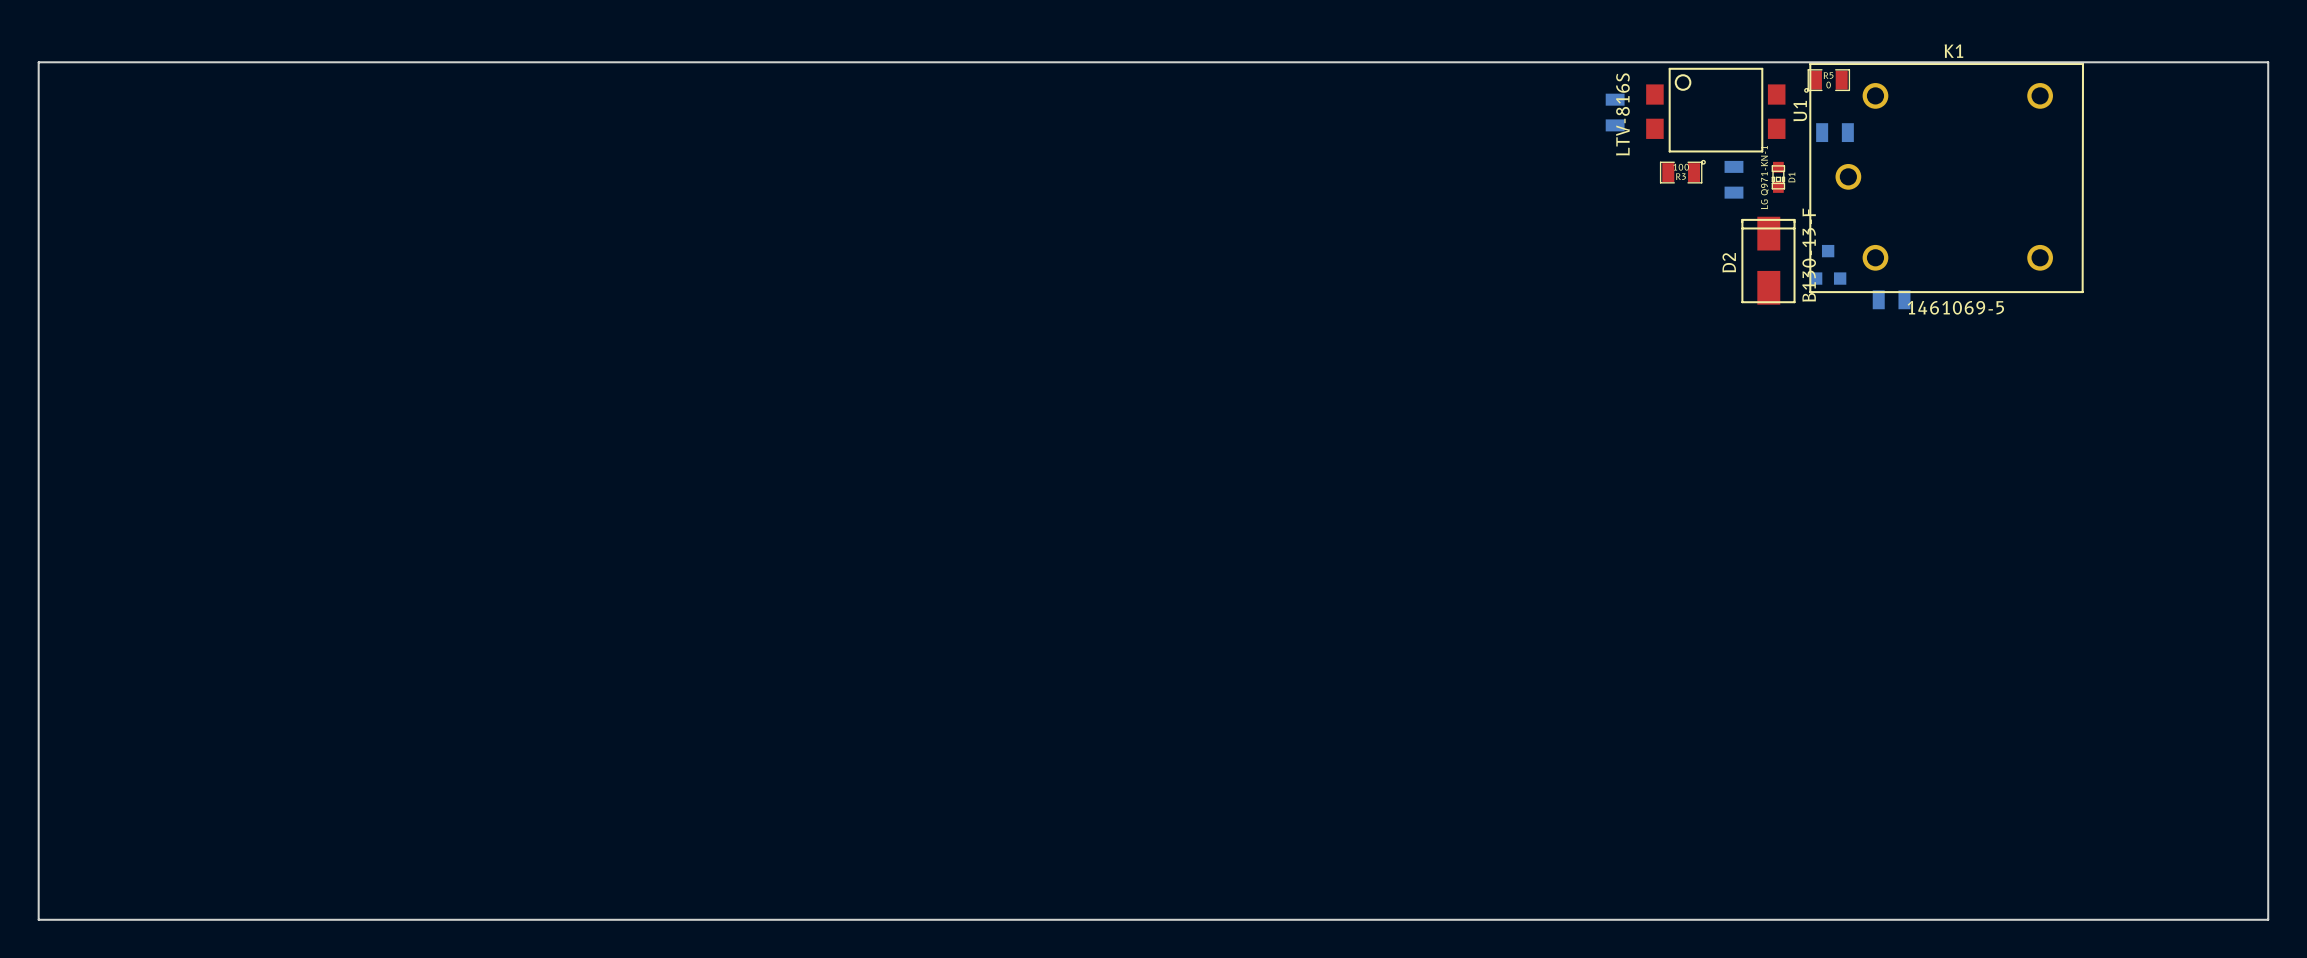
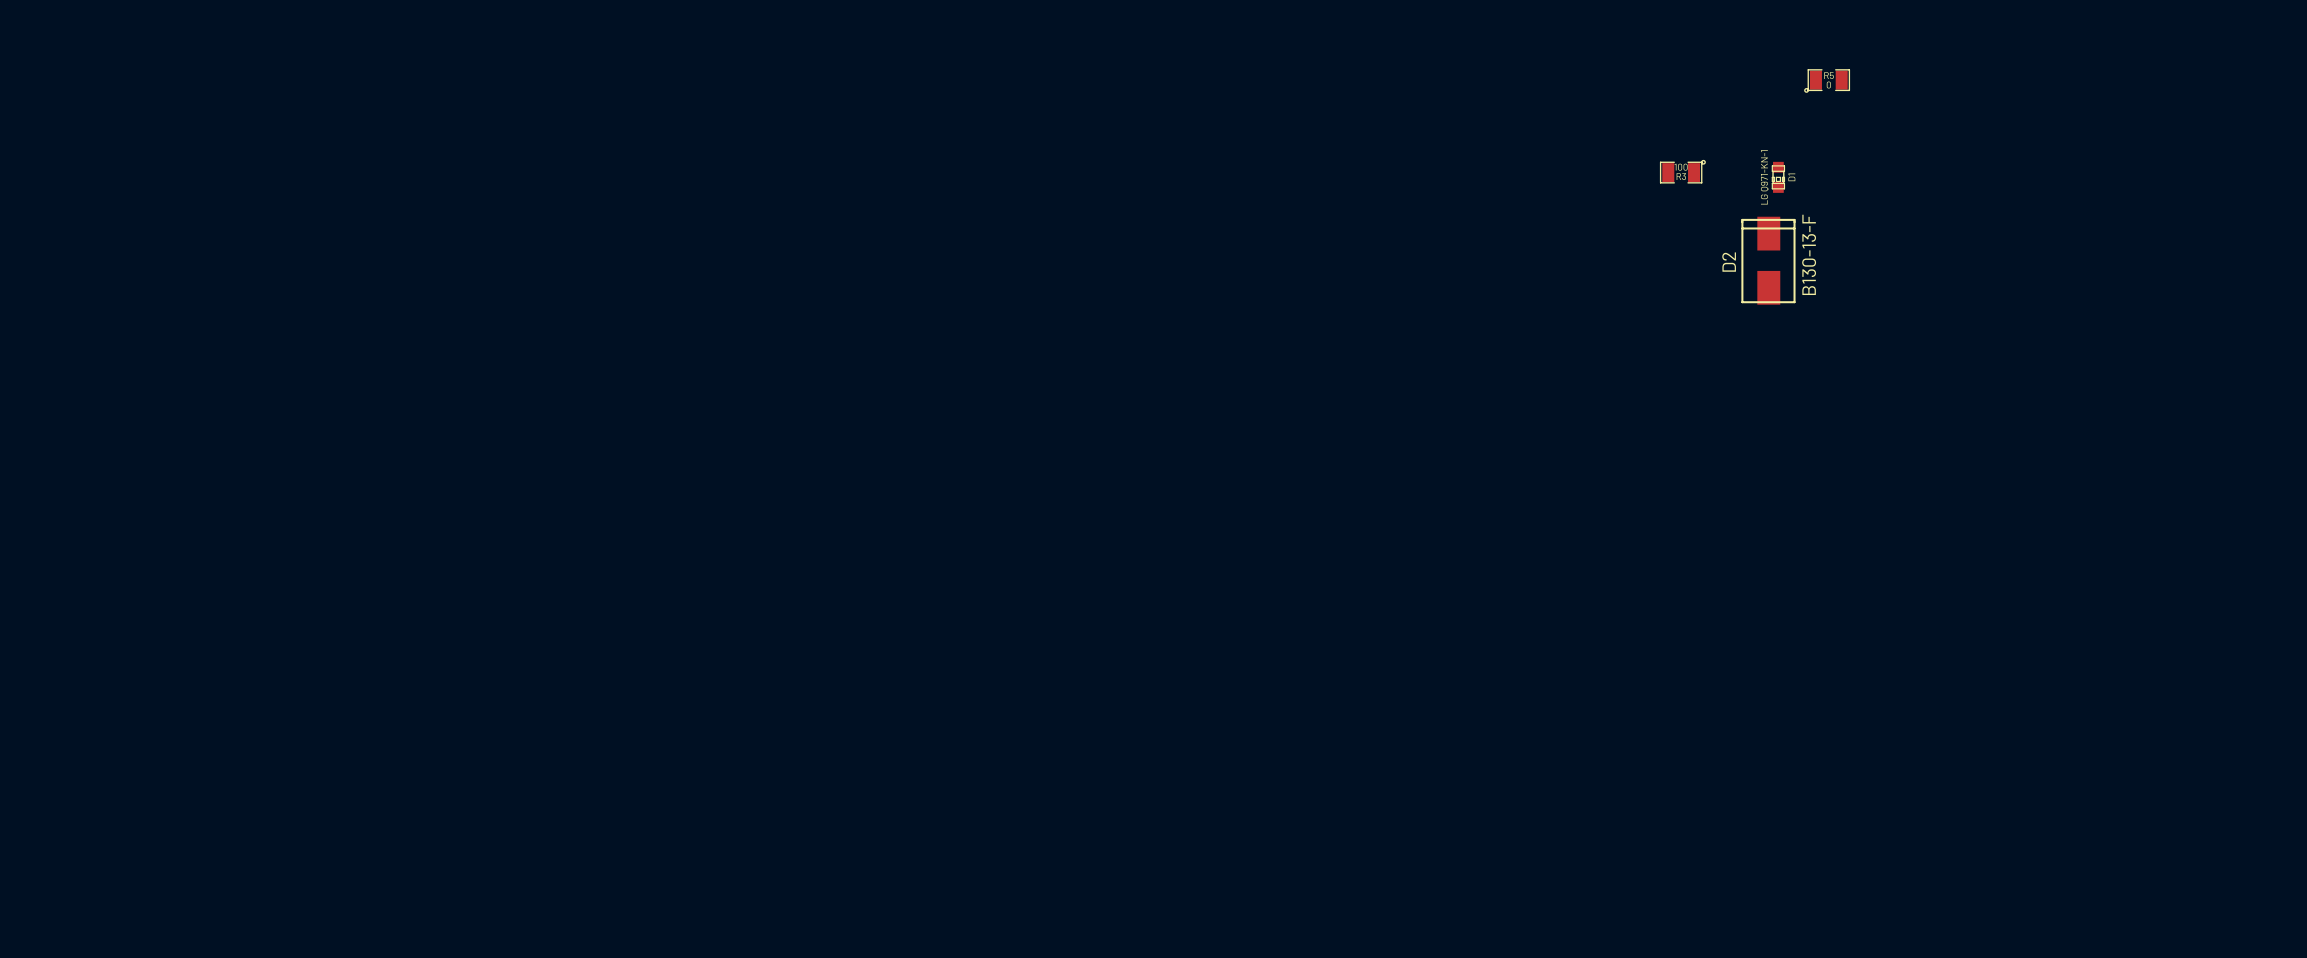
board edge: (38, 62) (38, 919) (2268, 919) (2268, 62) (38, 62) -> none
U1: LTV-816S (1715, 110) -> none
part: (1615, 112) -> none
part: (1835, 132) -> none
K1: 1461069-5 (1946, 178) -> none
part: (1733, 179) -> none
part: (1828, 264) -> none
part: (1891, 299) -> none

